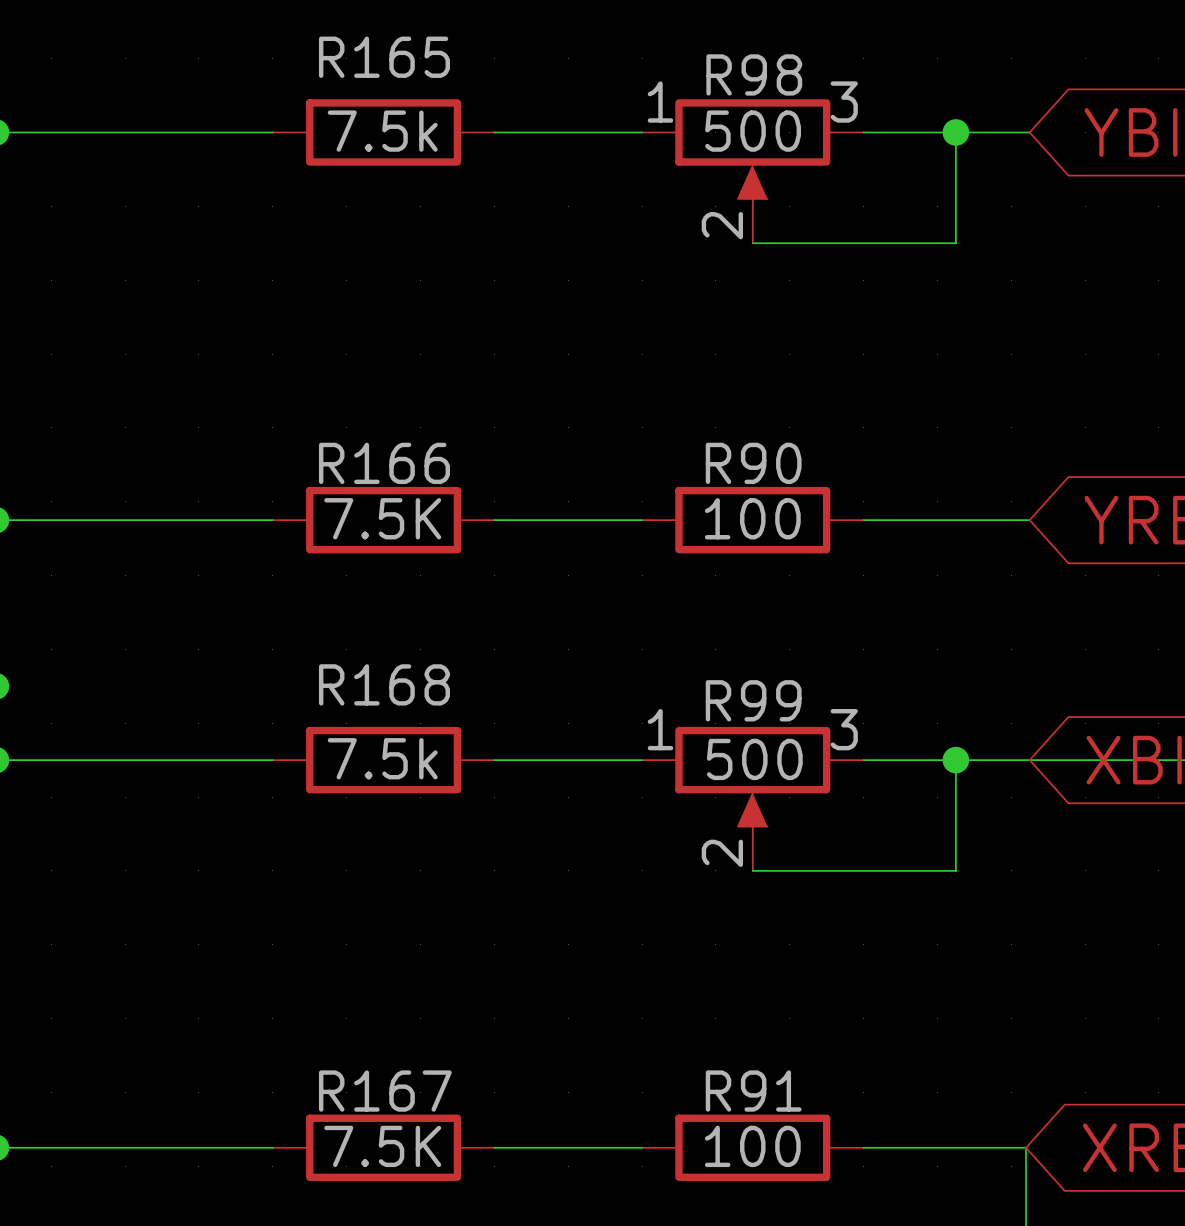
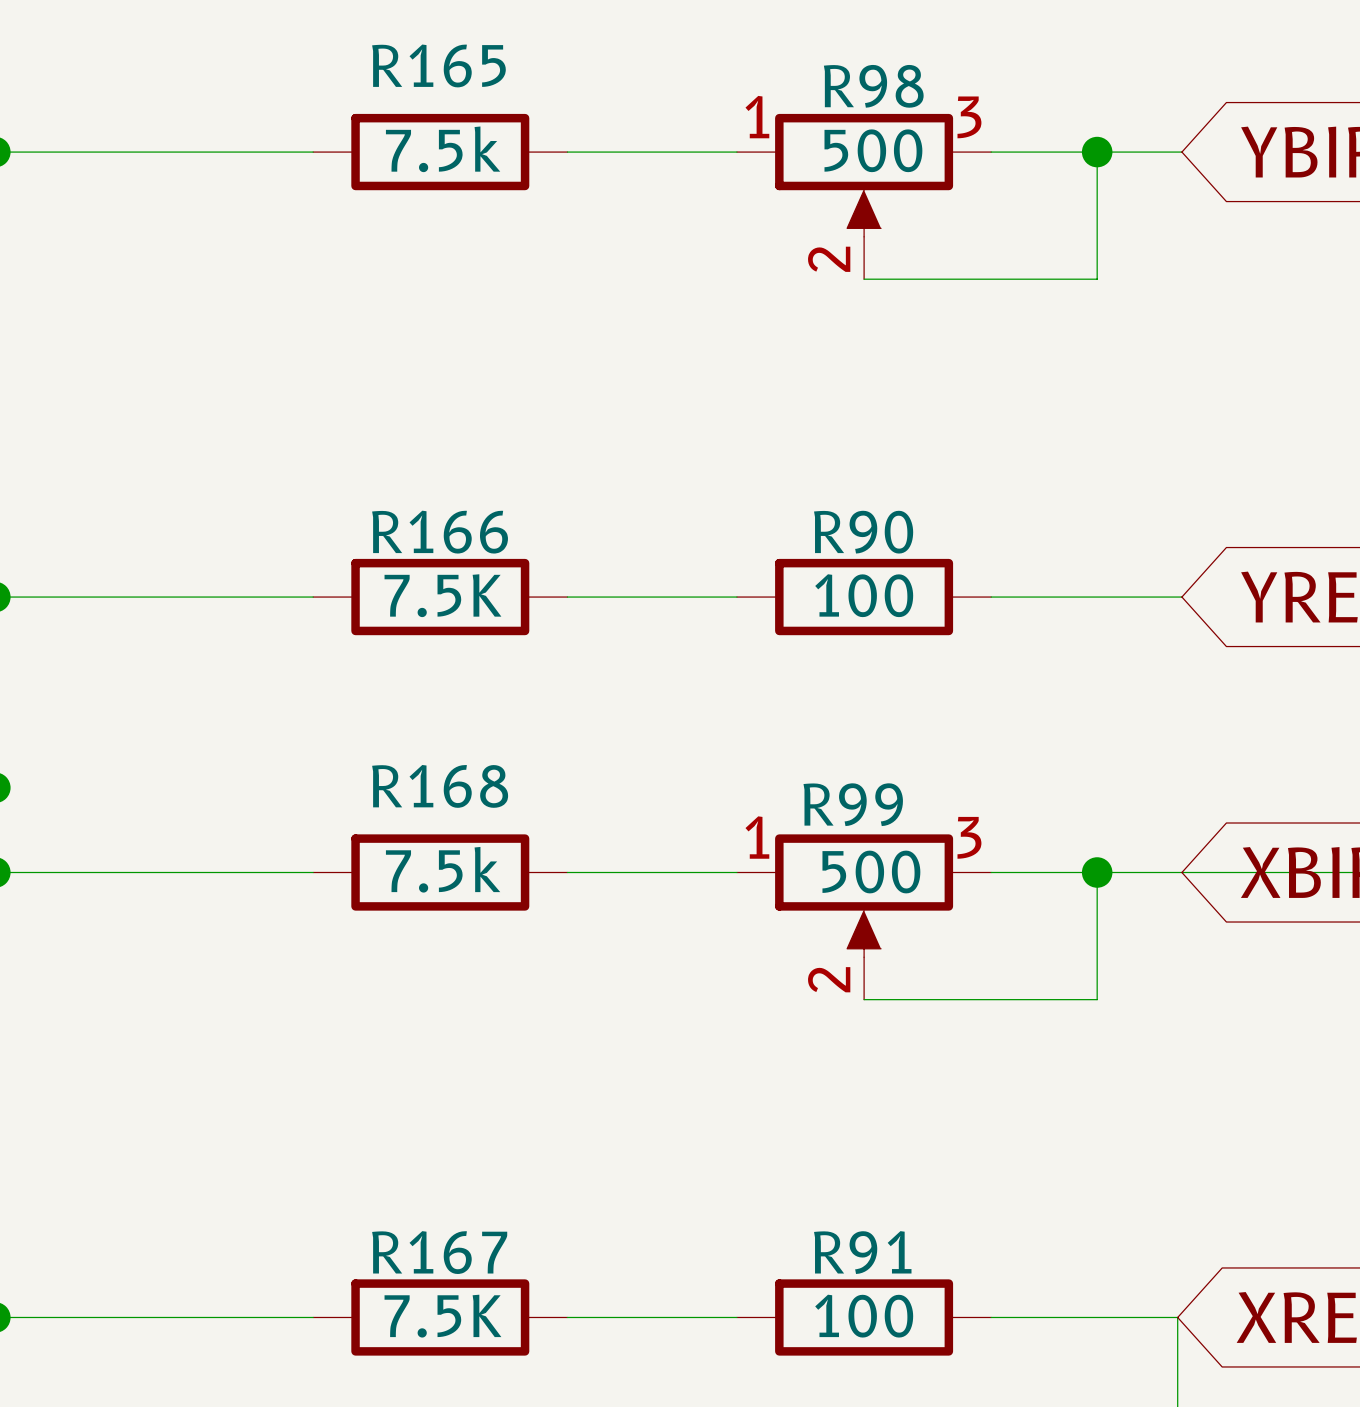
R98 name position: R98 (754, 74) -> R98 (873, 86)
R98 value position: 500 (753, 131) -> 500 (873, 150)
R99 value position: 500 (754, 759) -> 500 (871, 872)

